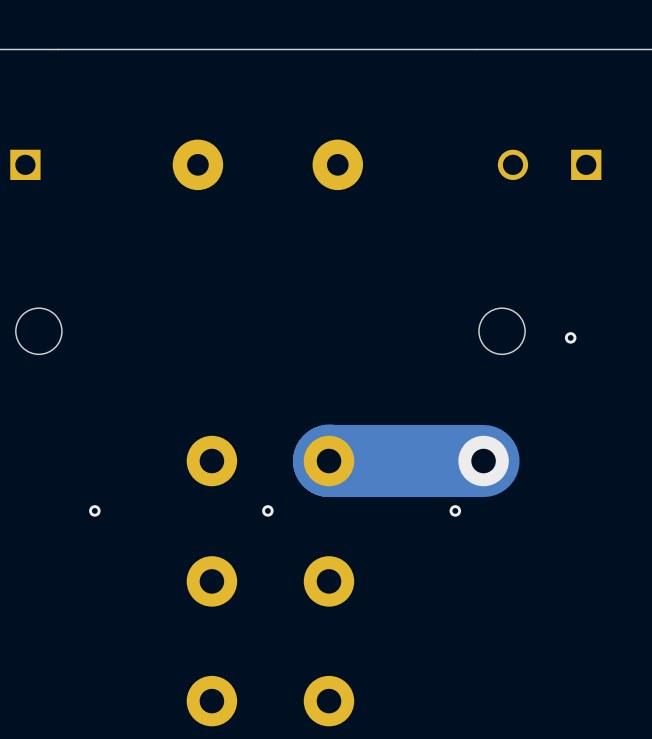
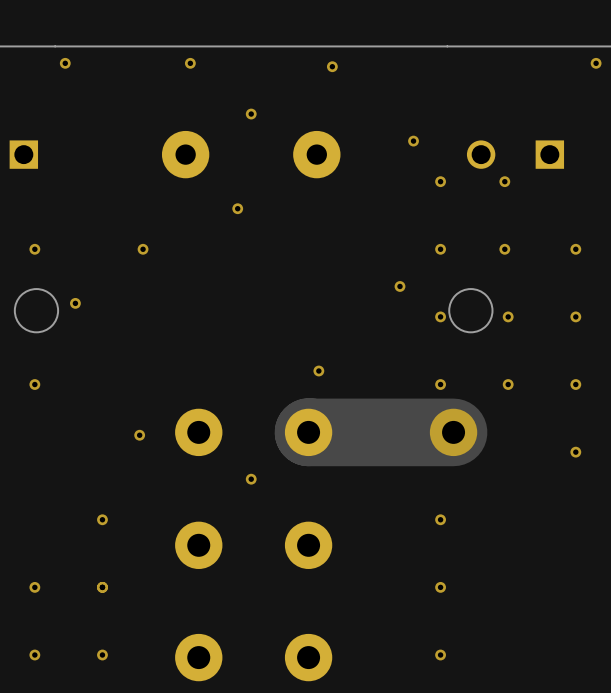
via: none -> (65, 63)
via: none -> (190, 63)
via: none -> (596, 63)
via: none -> (332, 66)
via: none -> (251, 114)
via: none -> (413, 141)
via: none -> (440, 181)
via: none -> (504, 181)
via: none -> (237, 208)
via: none -> (34, 249)
via: none -> (143, 249)
via: none -> (440, 249)
via: none -> (504, 249)
via: none -> (575, 249)
via: none -> (400, 286)
via: none -> (75, 303)
via: none -> (440, 316)
via: none -> (508, 316)
via: (570, 337) -> none
via: none -> (575, 316)
via: none -> (318, 371)
via: none -> (34, 384)
via: none -> (440, 384)
via: none -> (508, 384)
via: none -> (575, 384)
via: none -> (139, 435)
via: none -> (575, 452)
via: (94, 510) -> none
via position: (455, 510) -> (440, 519)
via: none -> (102, 519)
via: none -> (34, 587)
via: none -> (102, 587)
via: none -> (440, 587)
via: none -> (34, 655)
via: none -> (102, 655)
via: none -> (440, 655)

